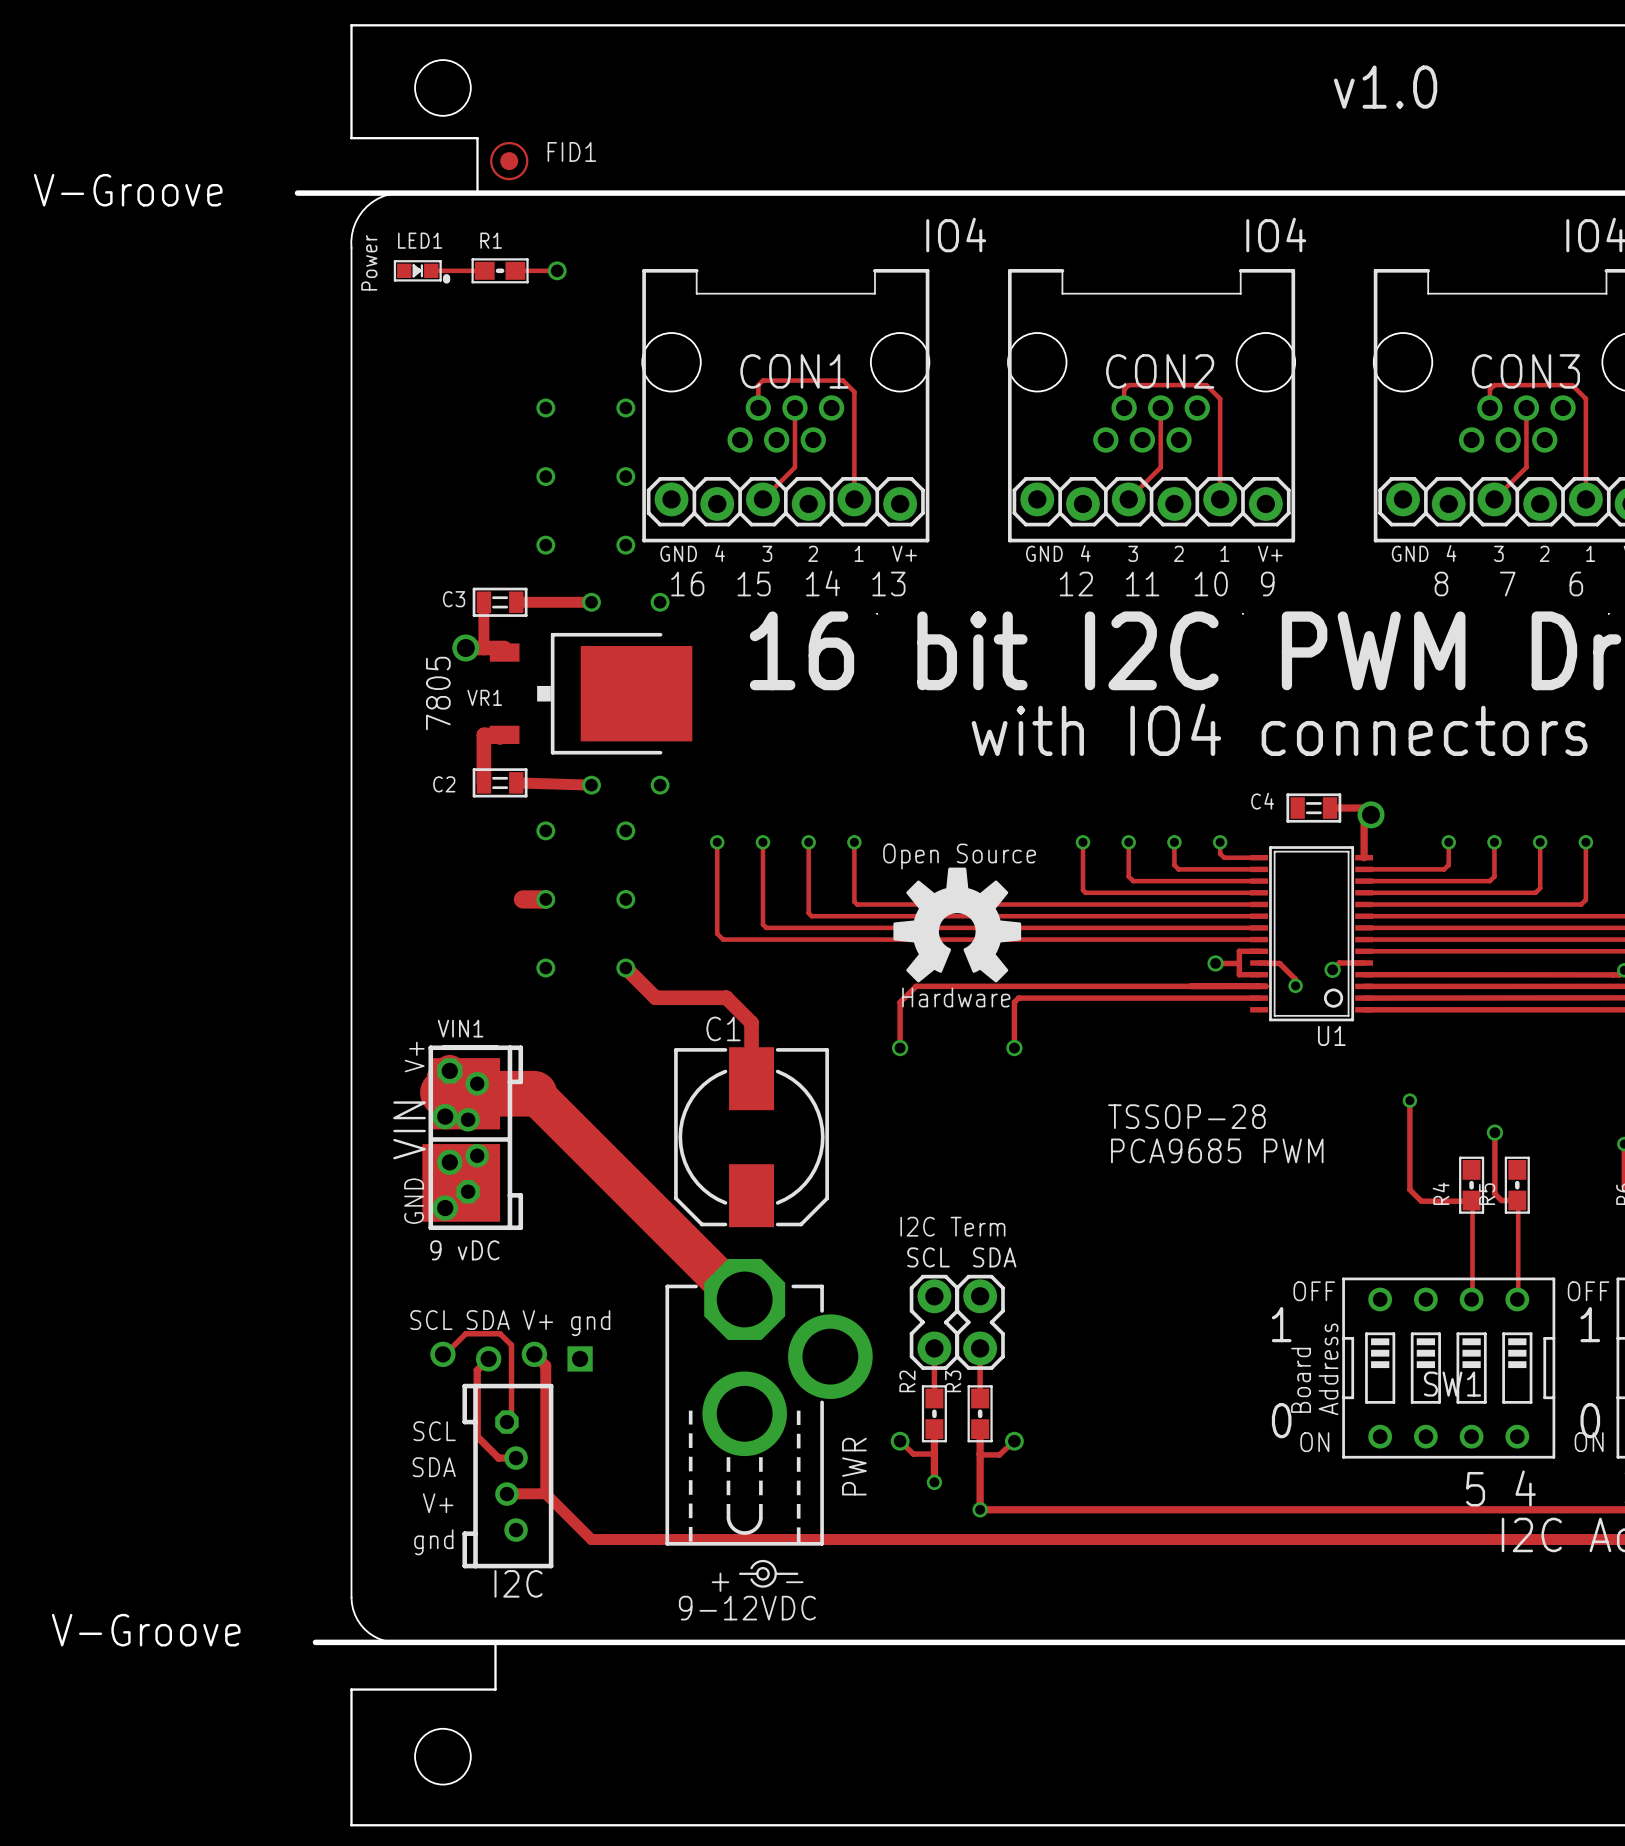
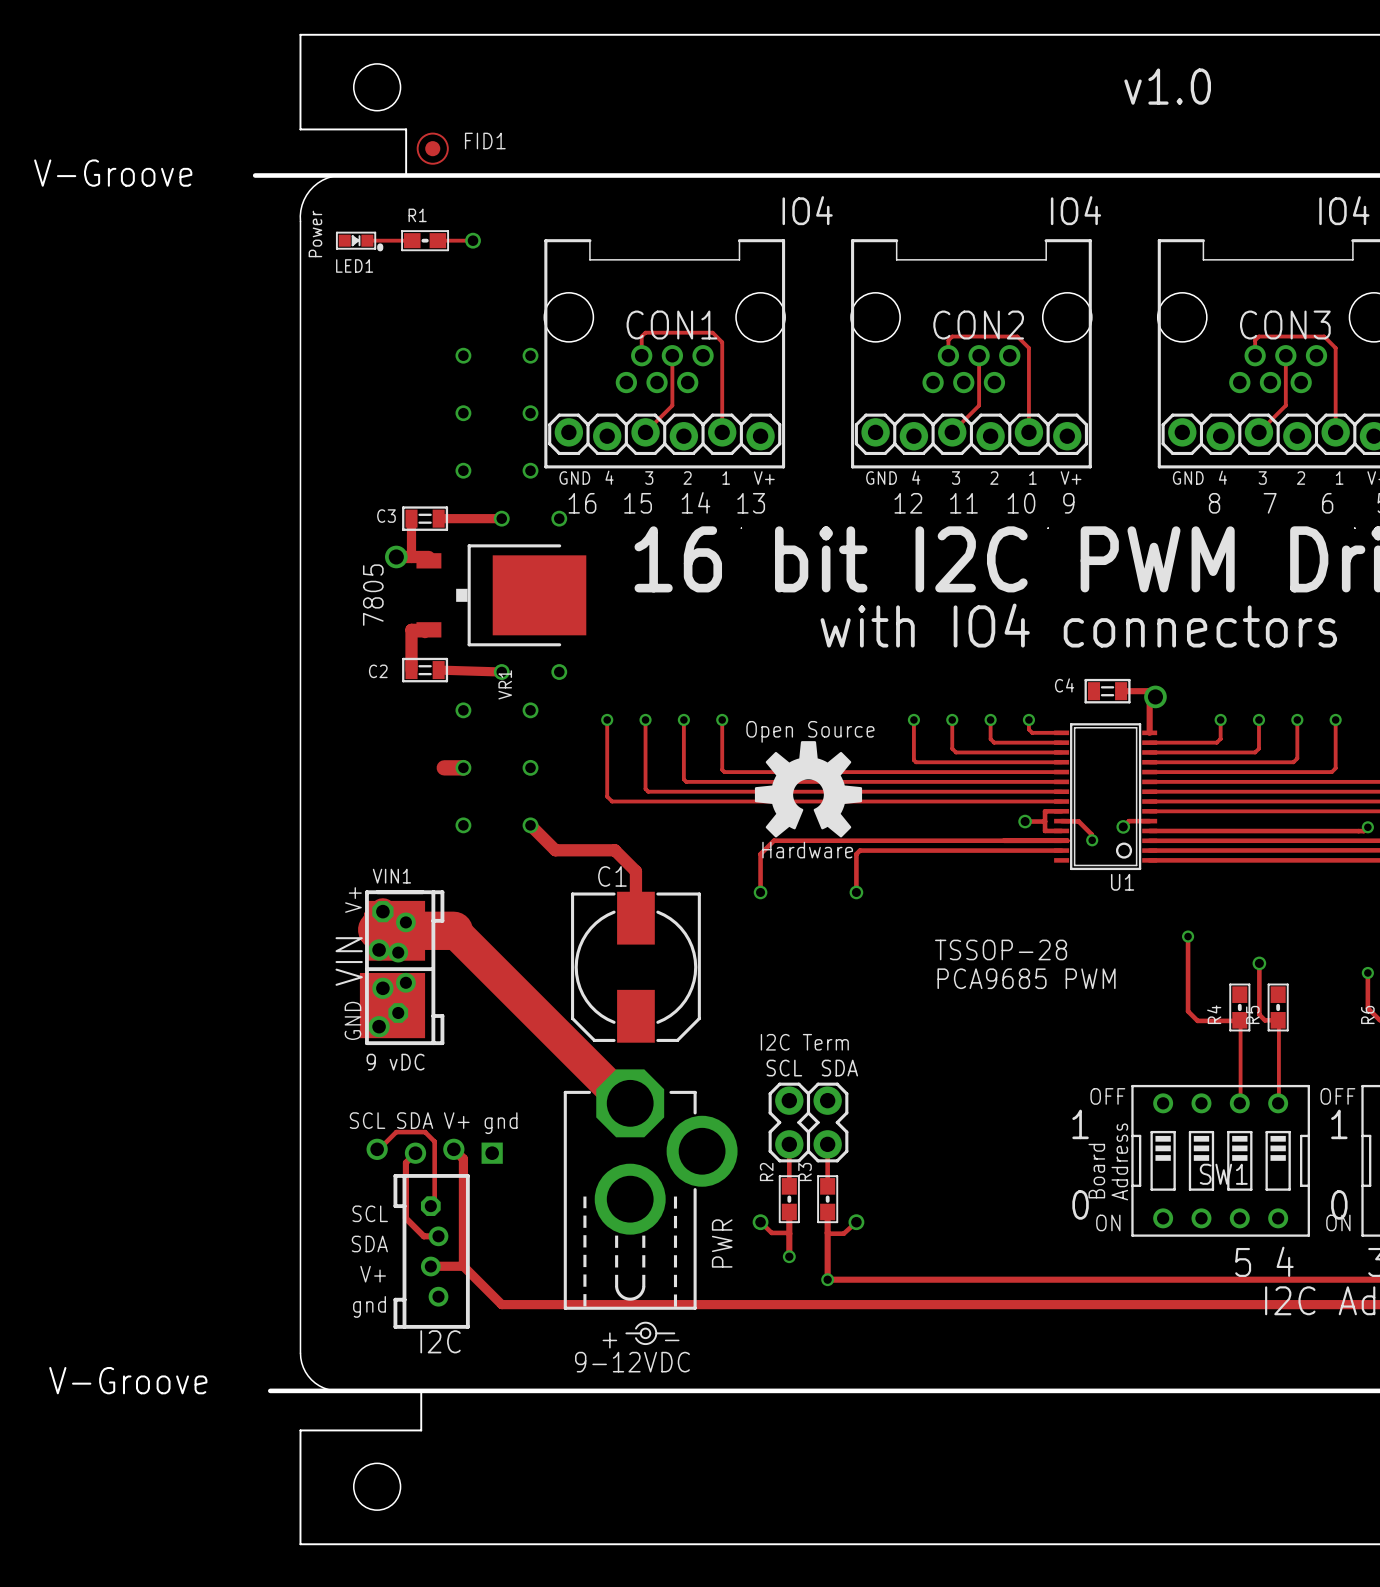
LED1 name position: LED1 (420, 240) -> LED1 (354, 265)
VR1 name rotation: 0° (484, 697) -> 90° counterclockwise (505, 684)
VR1 name position: VR1 (484, 697) -> VR1 (505, 684)

